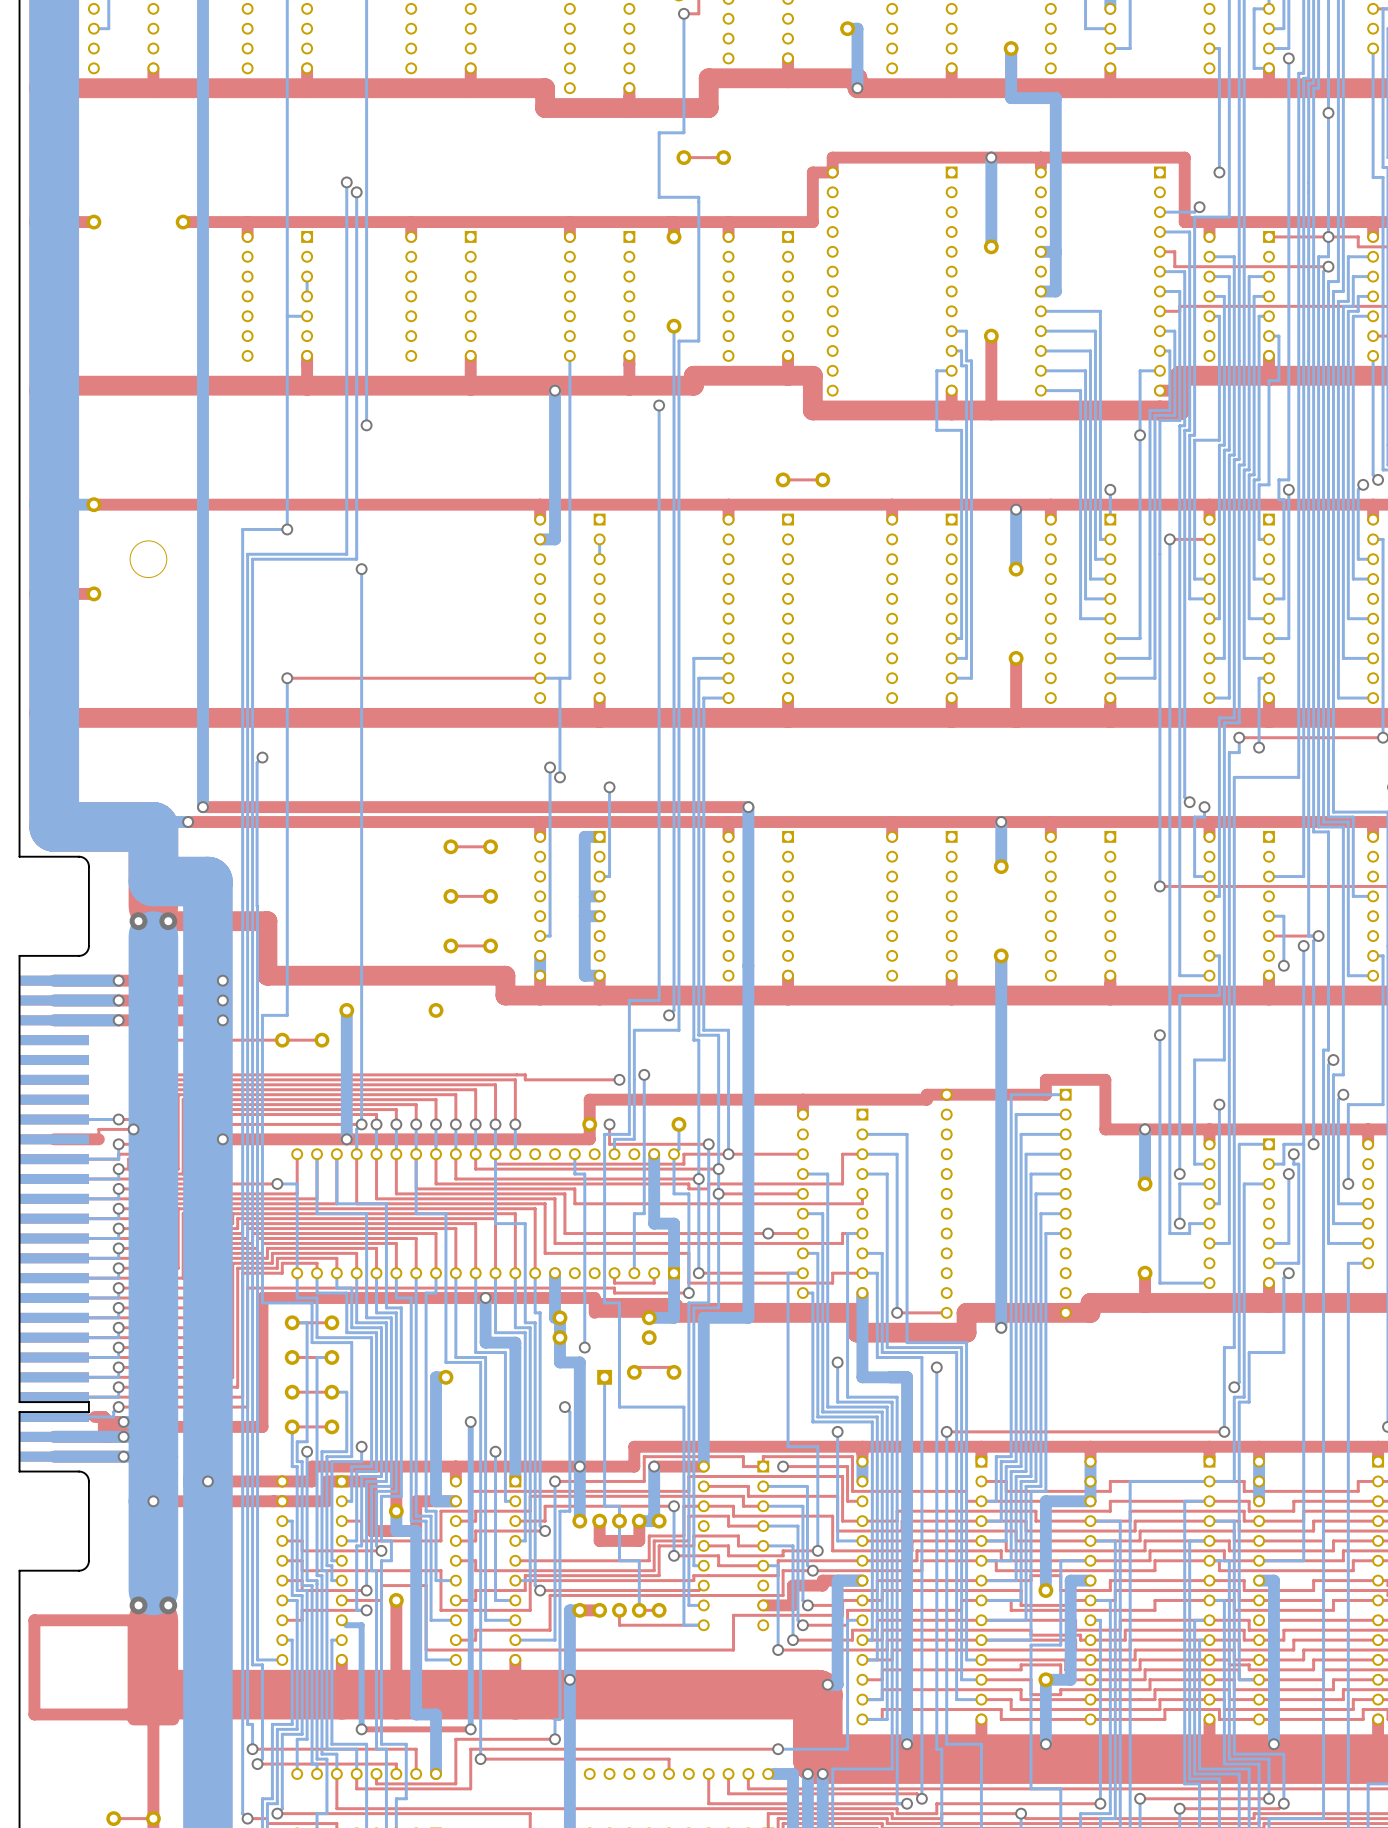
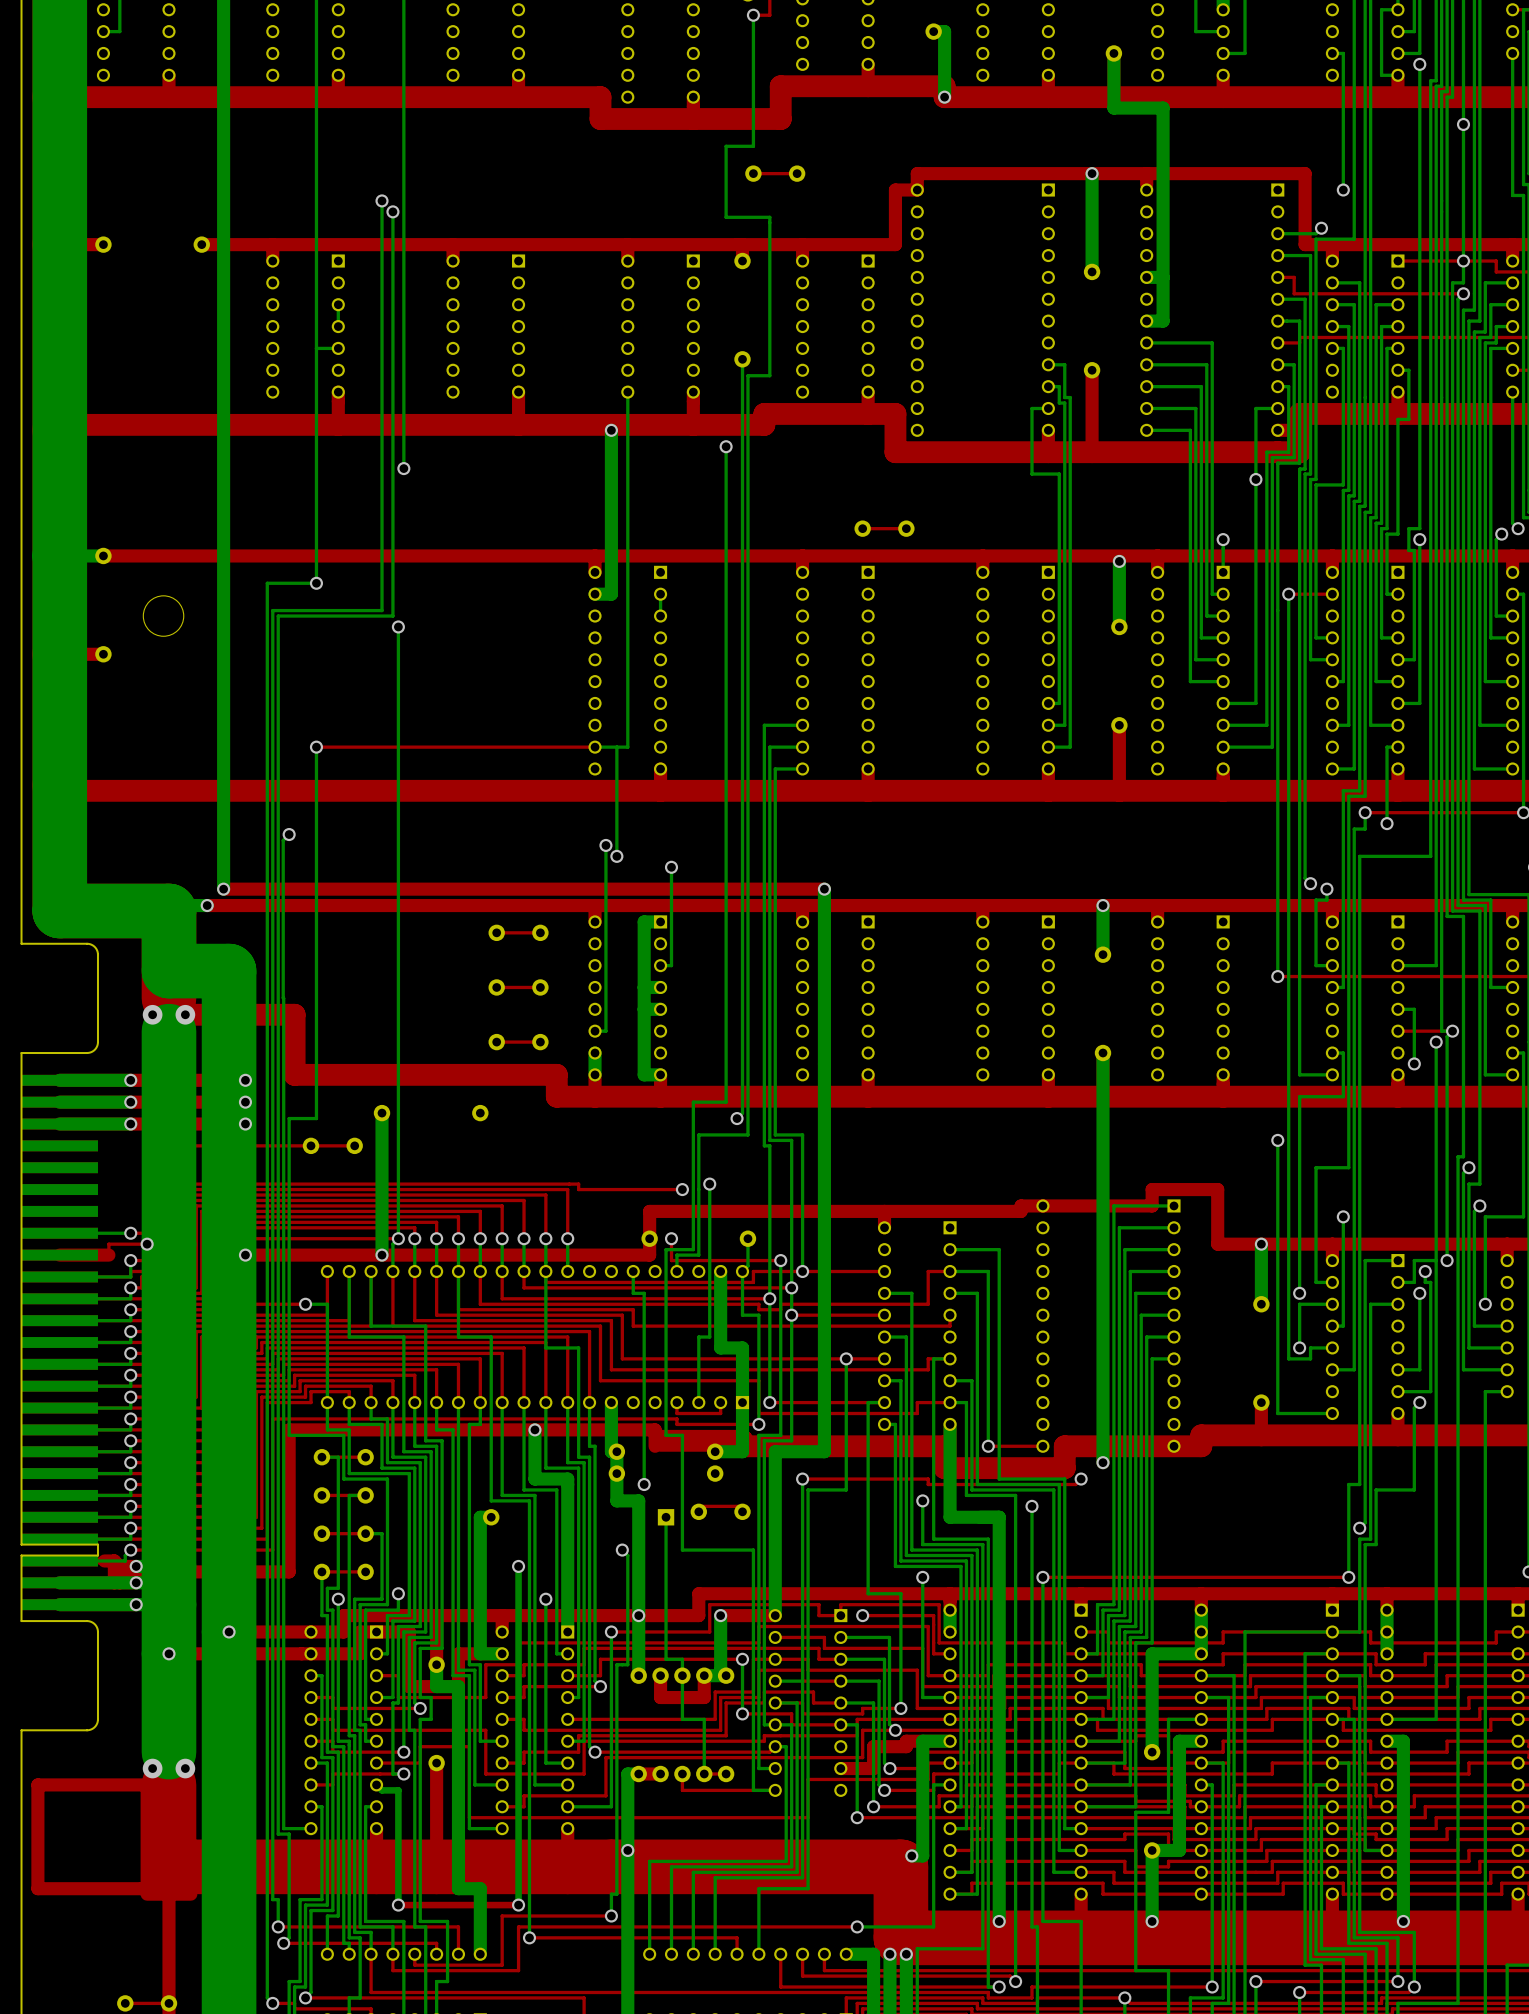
bottom track: none -> (846, 1358) (846, 1489) (808, 1489) (808, 1888) (758, 1888) (758, 1954)
bottom track: none -> (802, 1479) (802, 1877) (715, 1877) (715, 1954)
via: none -> (802, 1479)
top track: none -> (1081, 1479) (1075, 1484) (928, 1484) (928, 1479) (802, 1479)
via: none -> (1081, 1479)
bottom track: none -> (802, 1681) (775, 1681)
bottom track: none -> (775, 1702) (797, 1702) (797, 1872) (693, 1872) (693, 1954)
bottom track: none -> (775, 1724) (791, 1724) (791, 1866) (671, 1866) (671, 1954)
bottom track: none -> (775, 1746) (786, 1746) (786, 1861) (649, 1861) (649, 1954)

